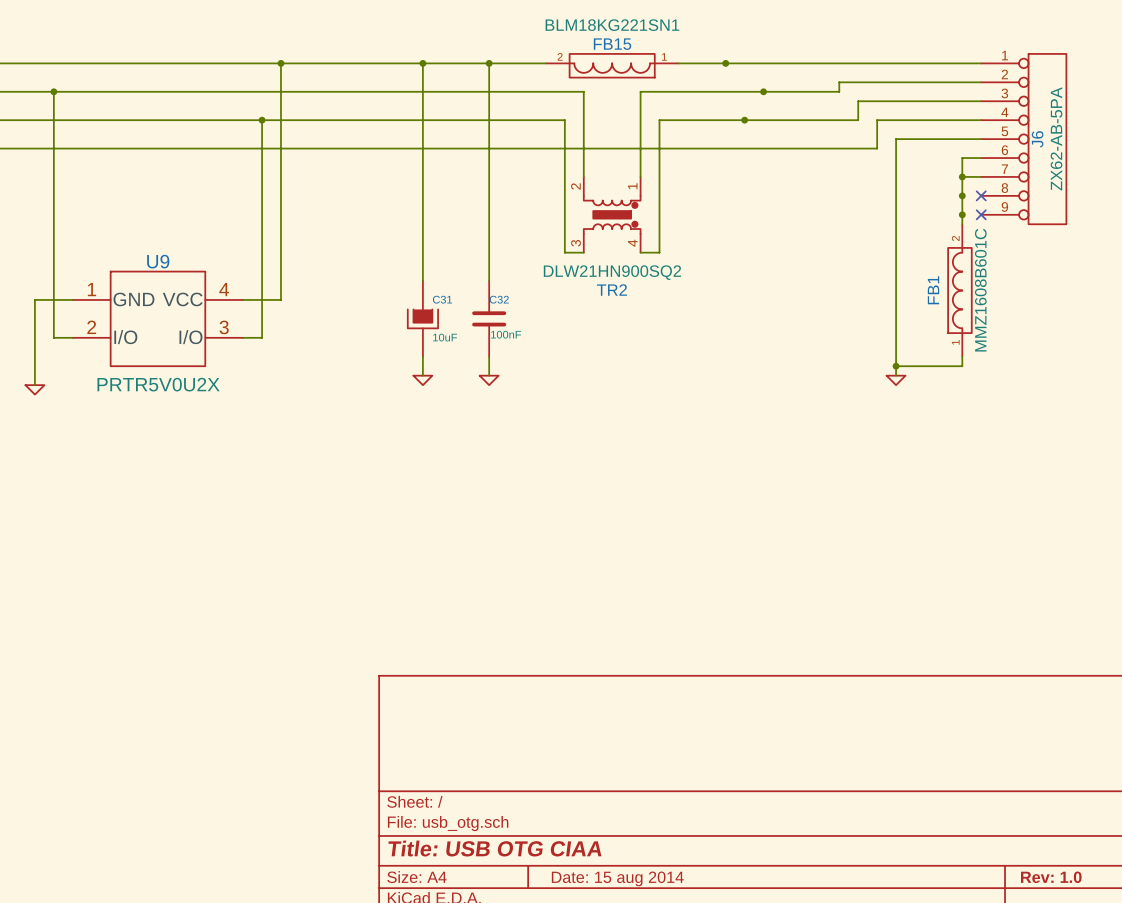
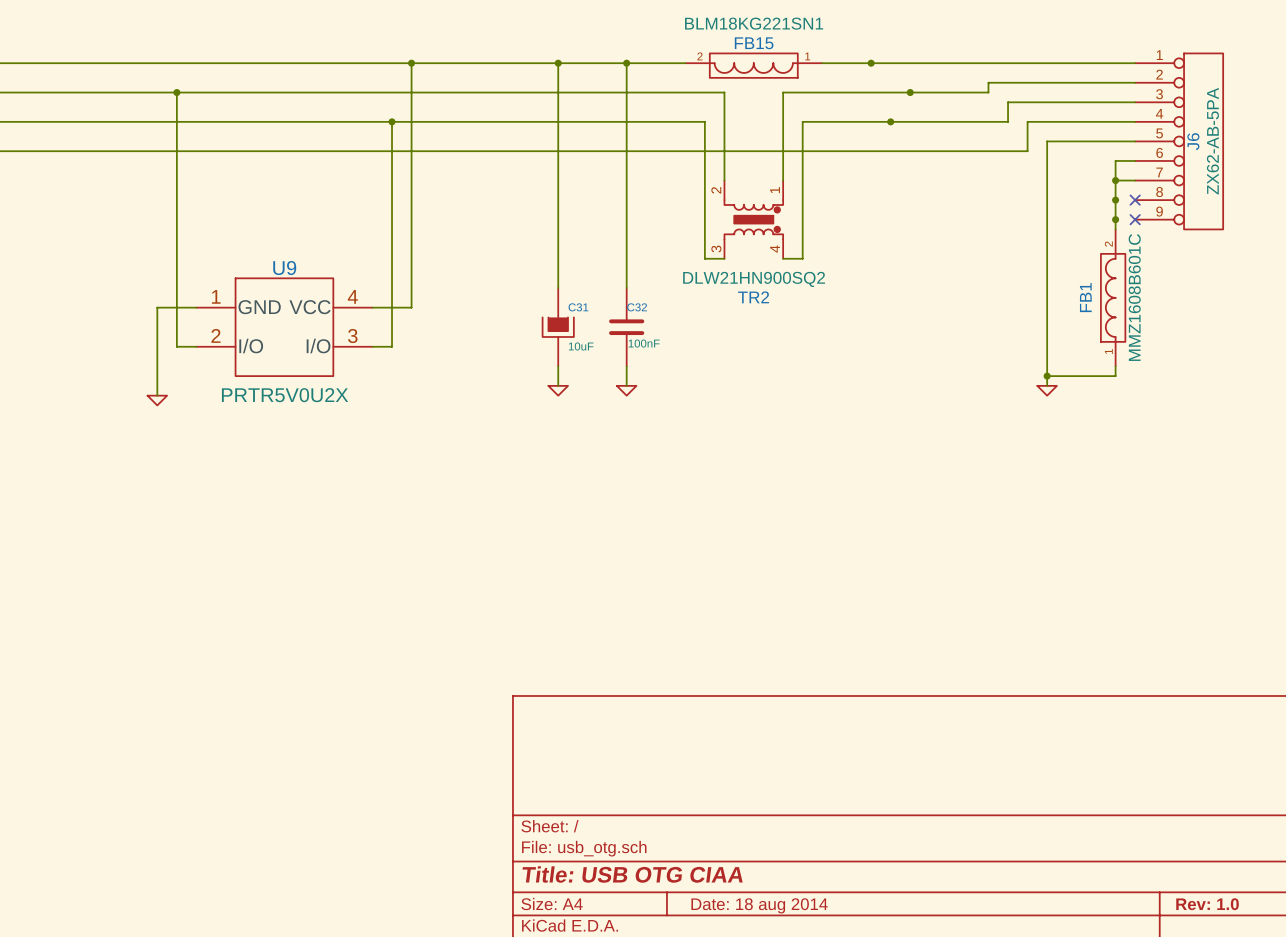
title block: Date: 15 aug 2014 (617, 878) -> Date: 18 aug 2014 (759, 905)

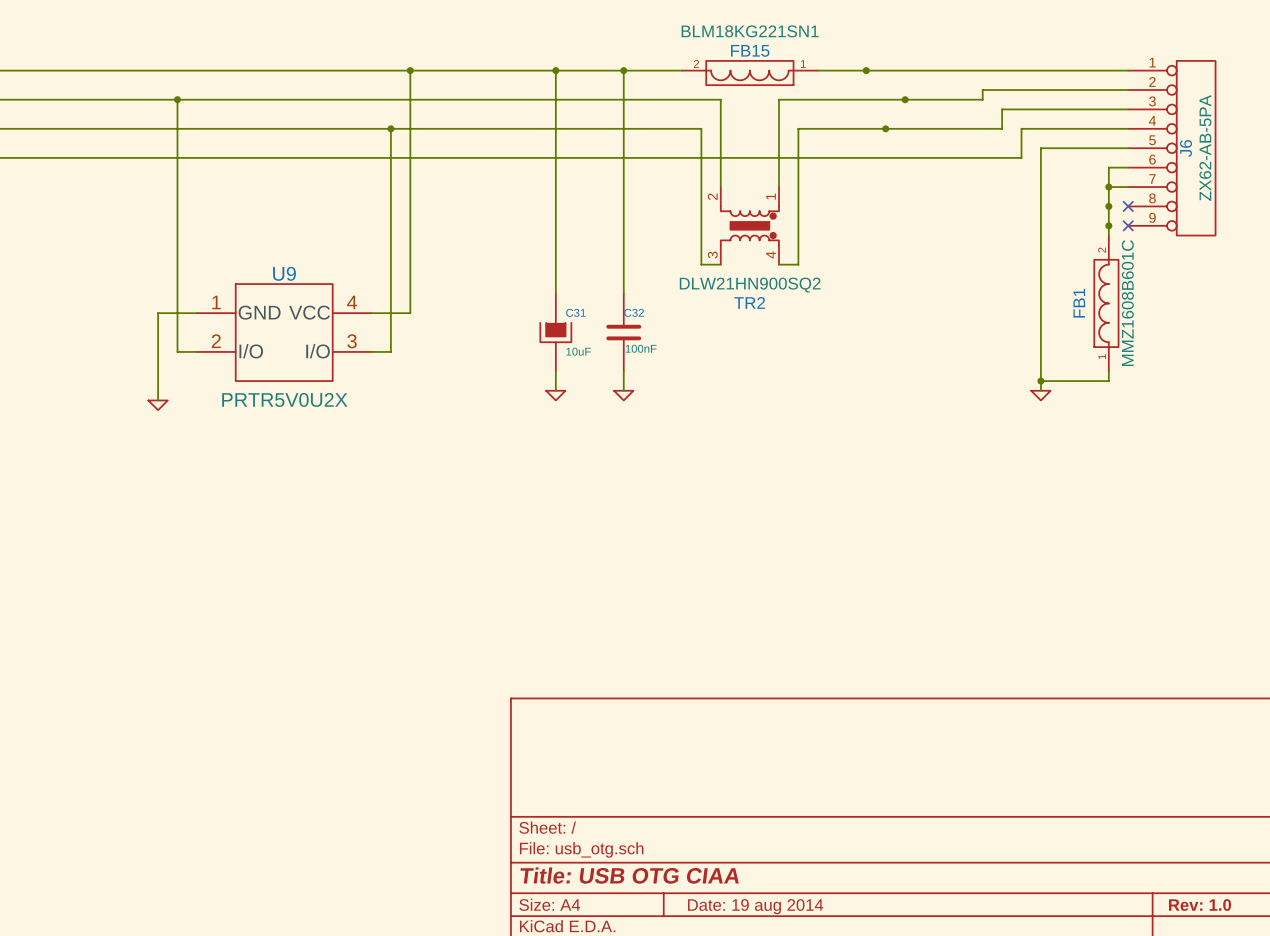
title block: Date: 18 aug 2014 (759, 905) -> Date: 19 aug 2014 (755, 906)

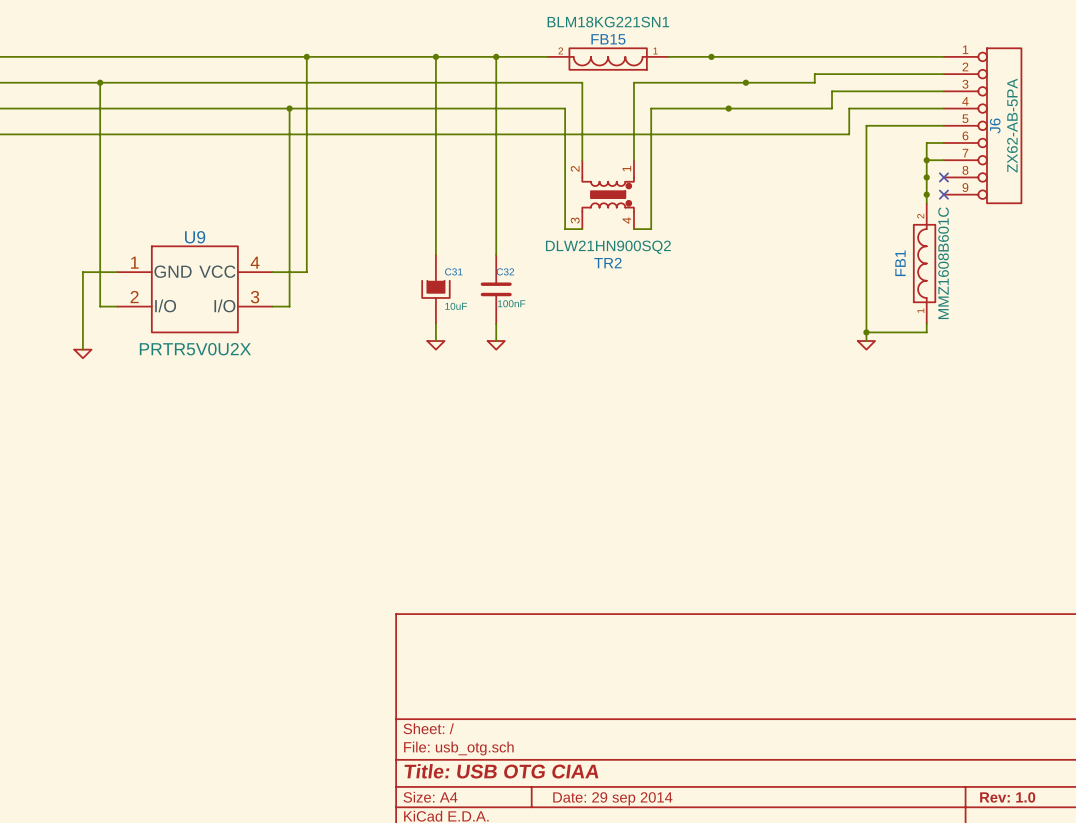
title block: Date: 19 aug 2014 (755, 906) -> Date: 29 sep 2014 (612, 798)

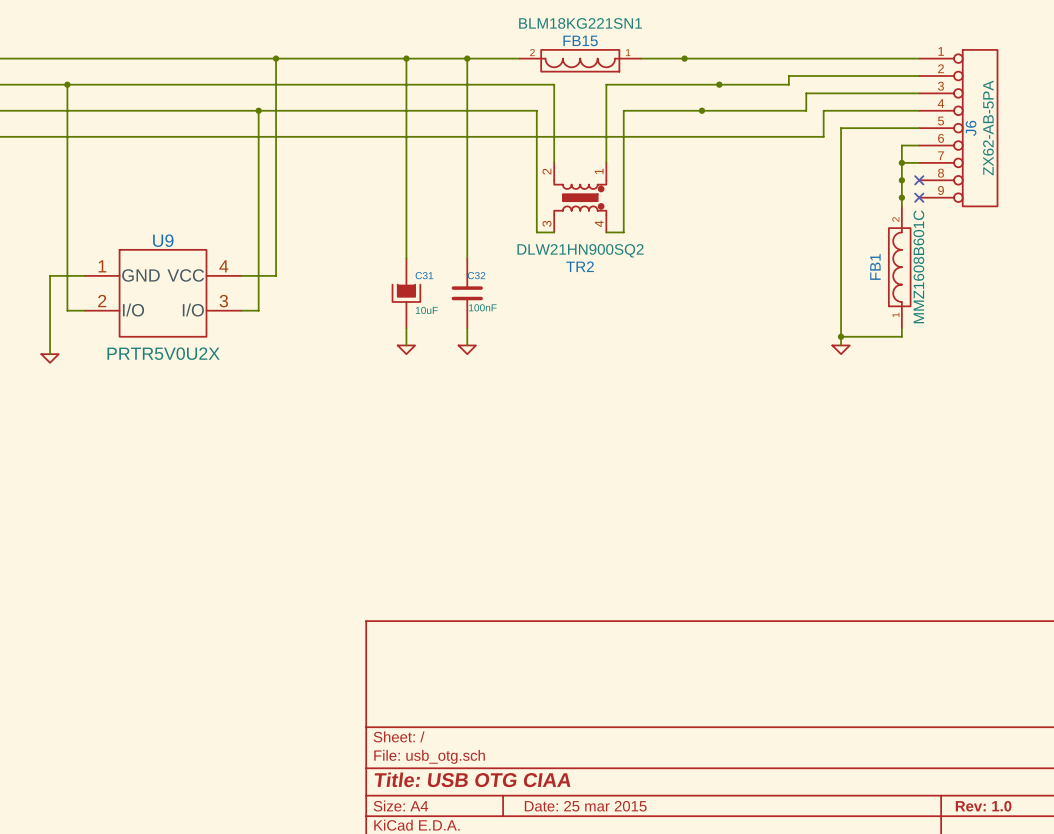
title block: Date: 29 sep 2014 (612, 798) -> Date: 25 mar 2015 (585, 806)

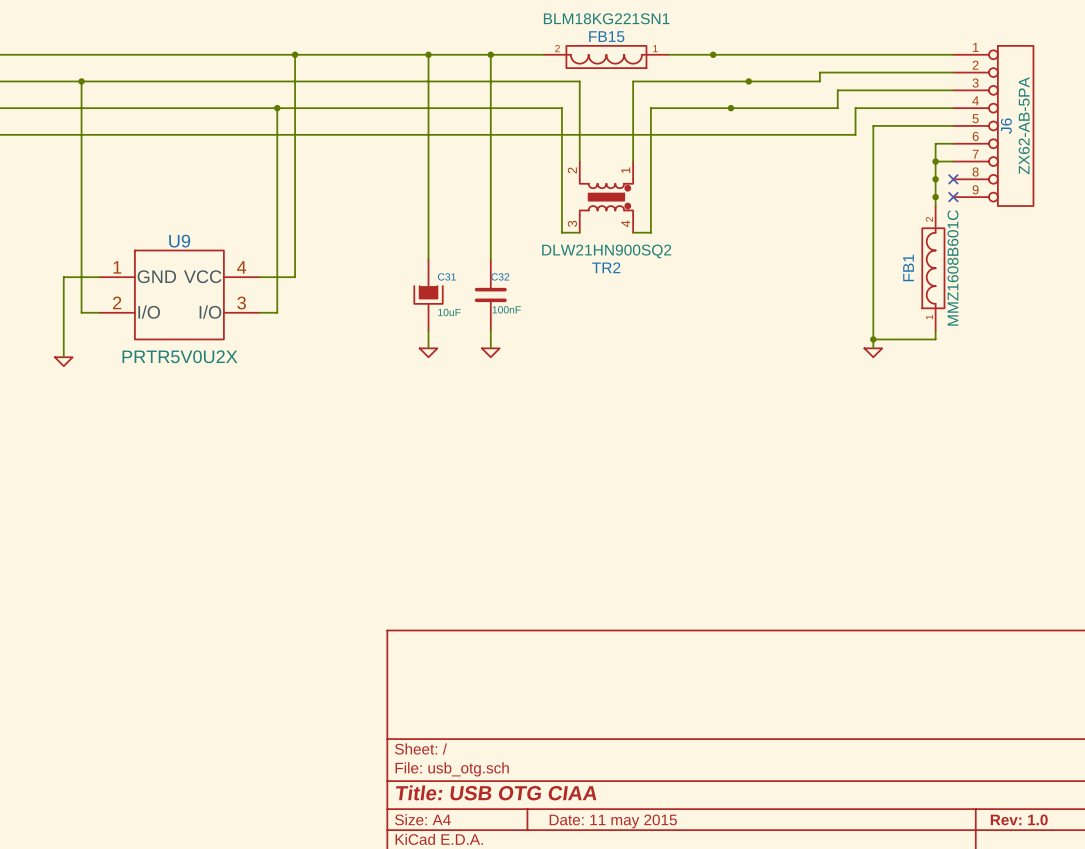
title block: Date: 25 mar 2015 (585, 806) -> Date: 11 may 2015 (613, 821)

